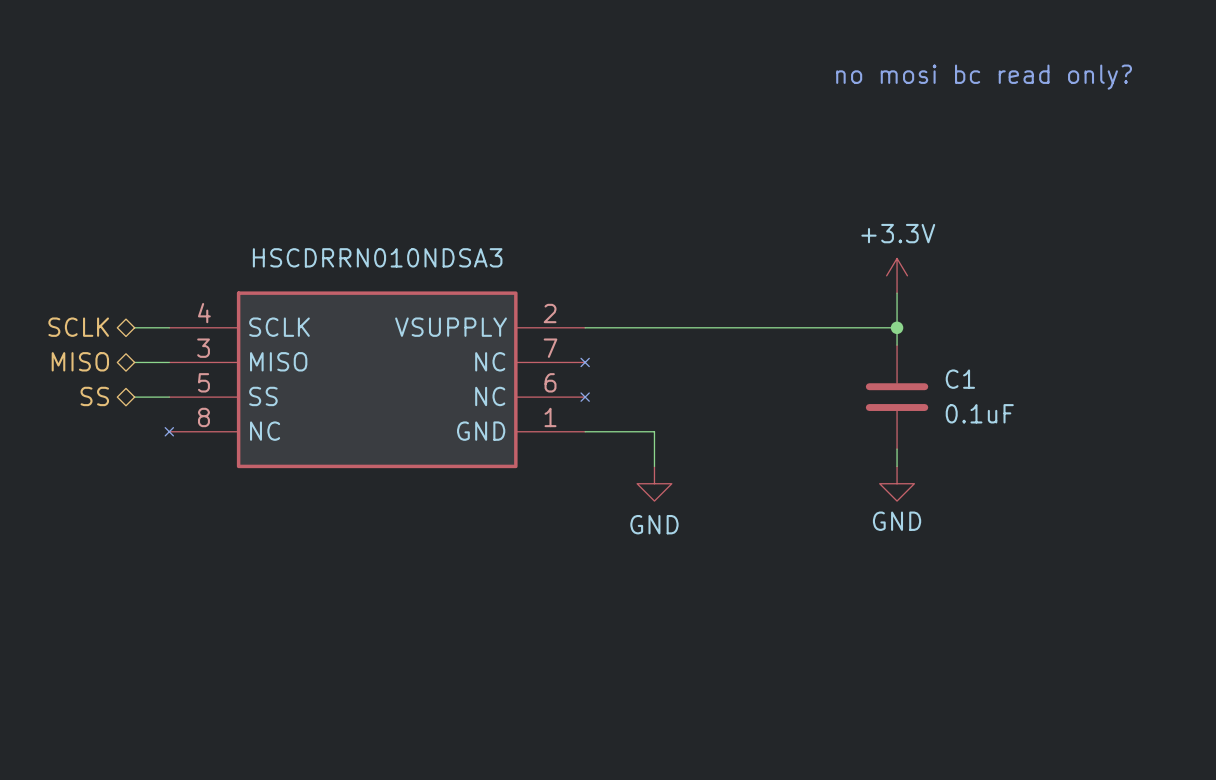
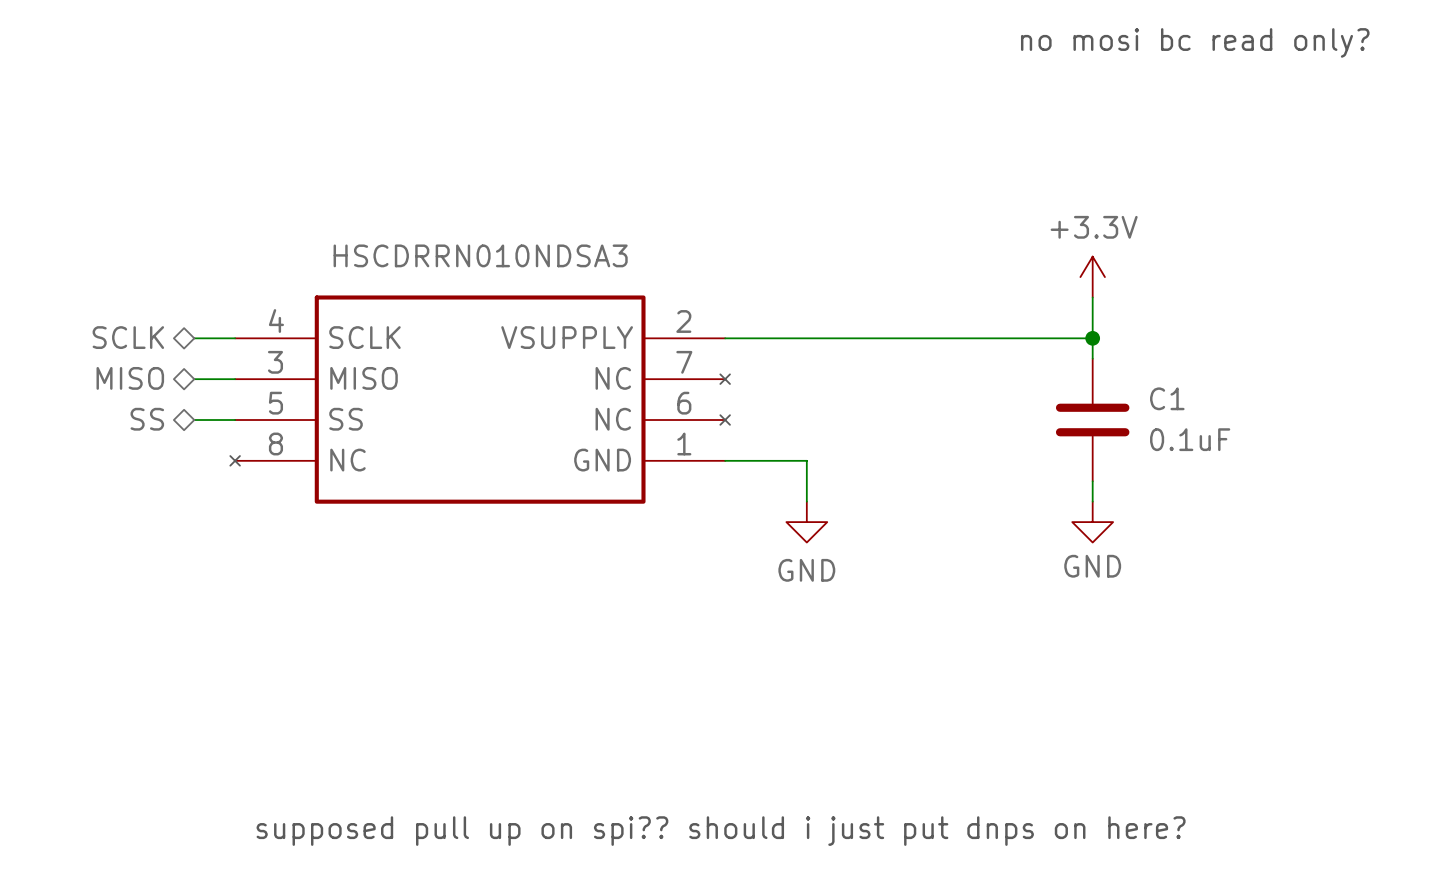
text: none -> supposed pull up on spi?? should i just put dnps on here? (721, 831)

